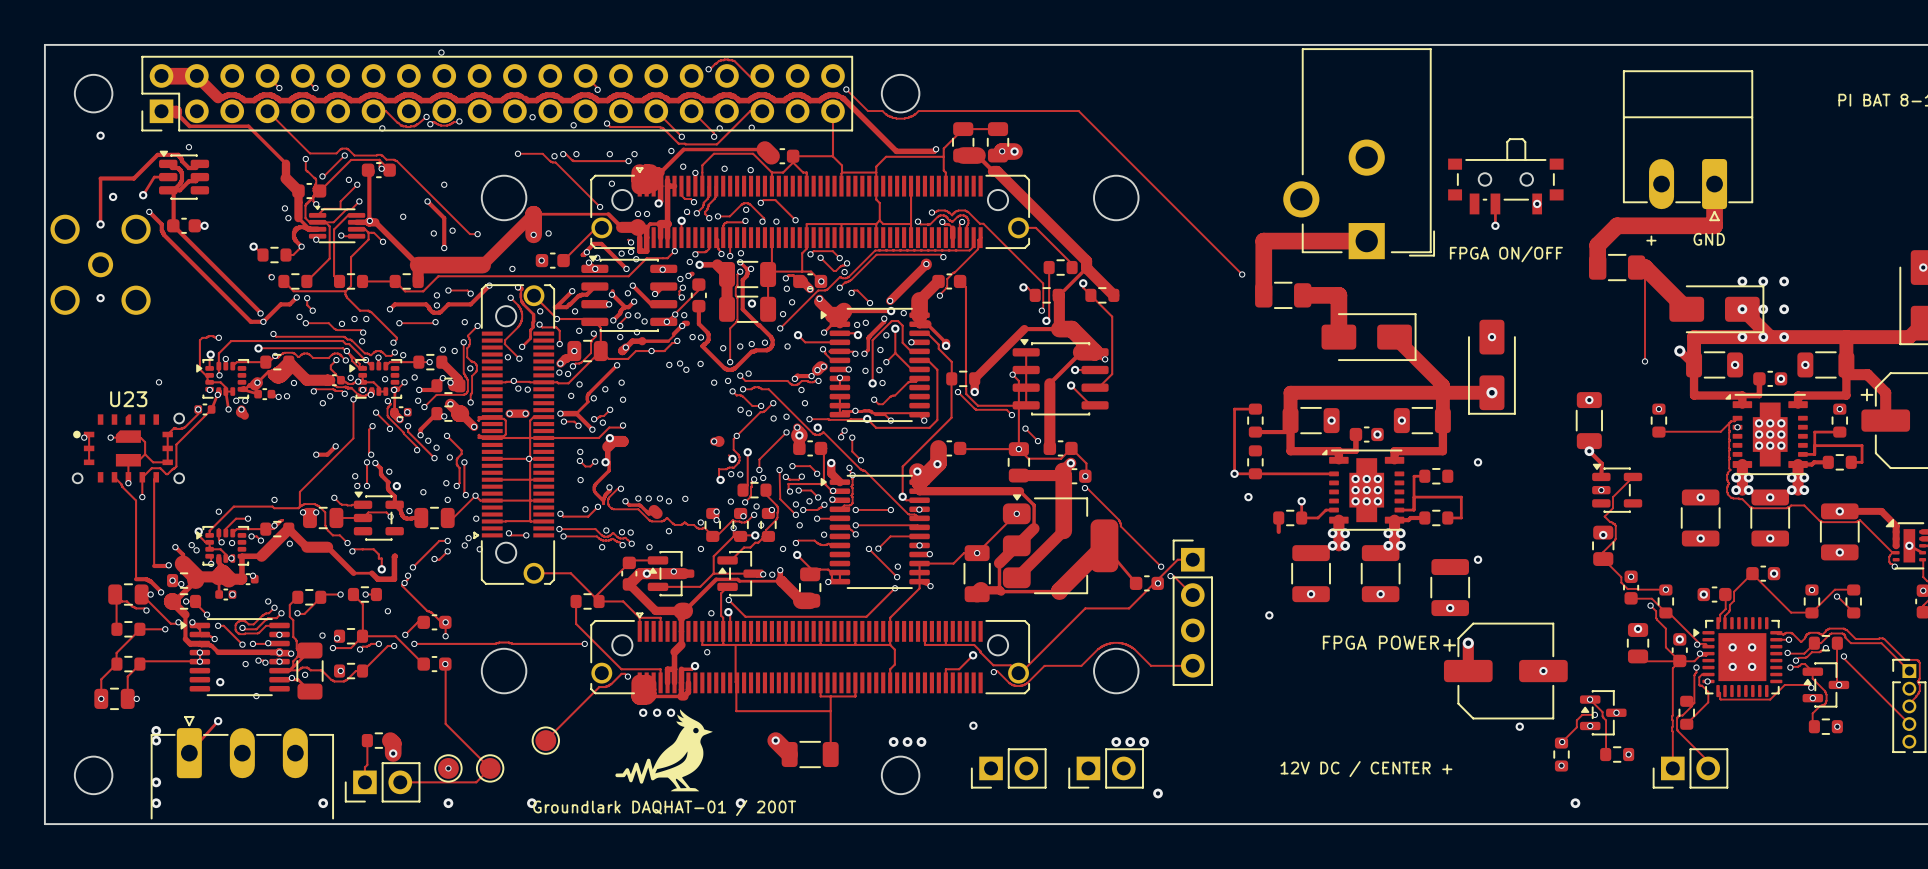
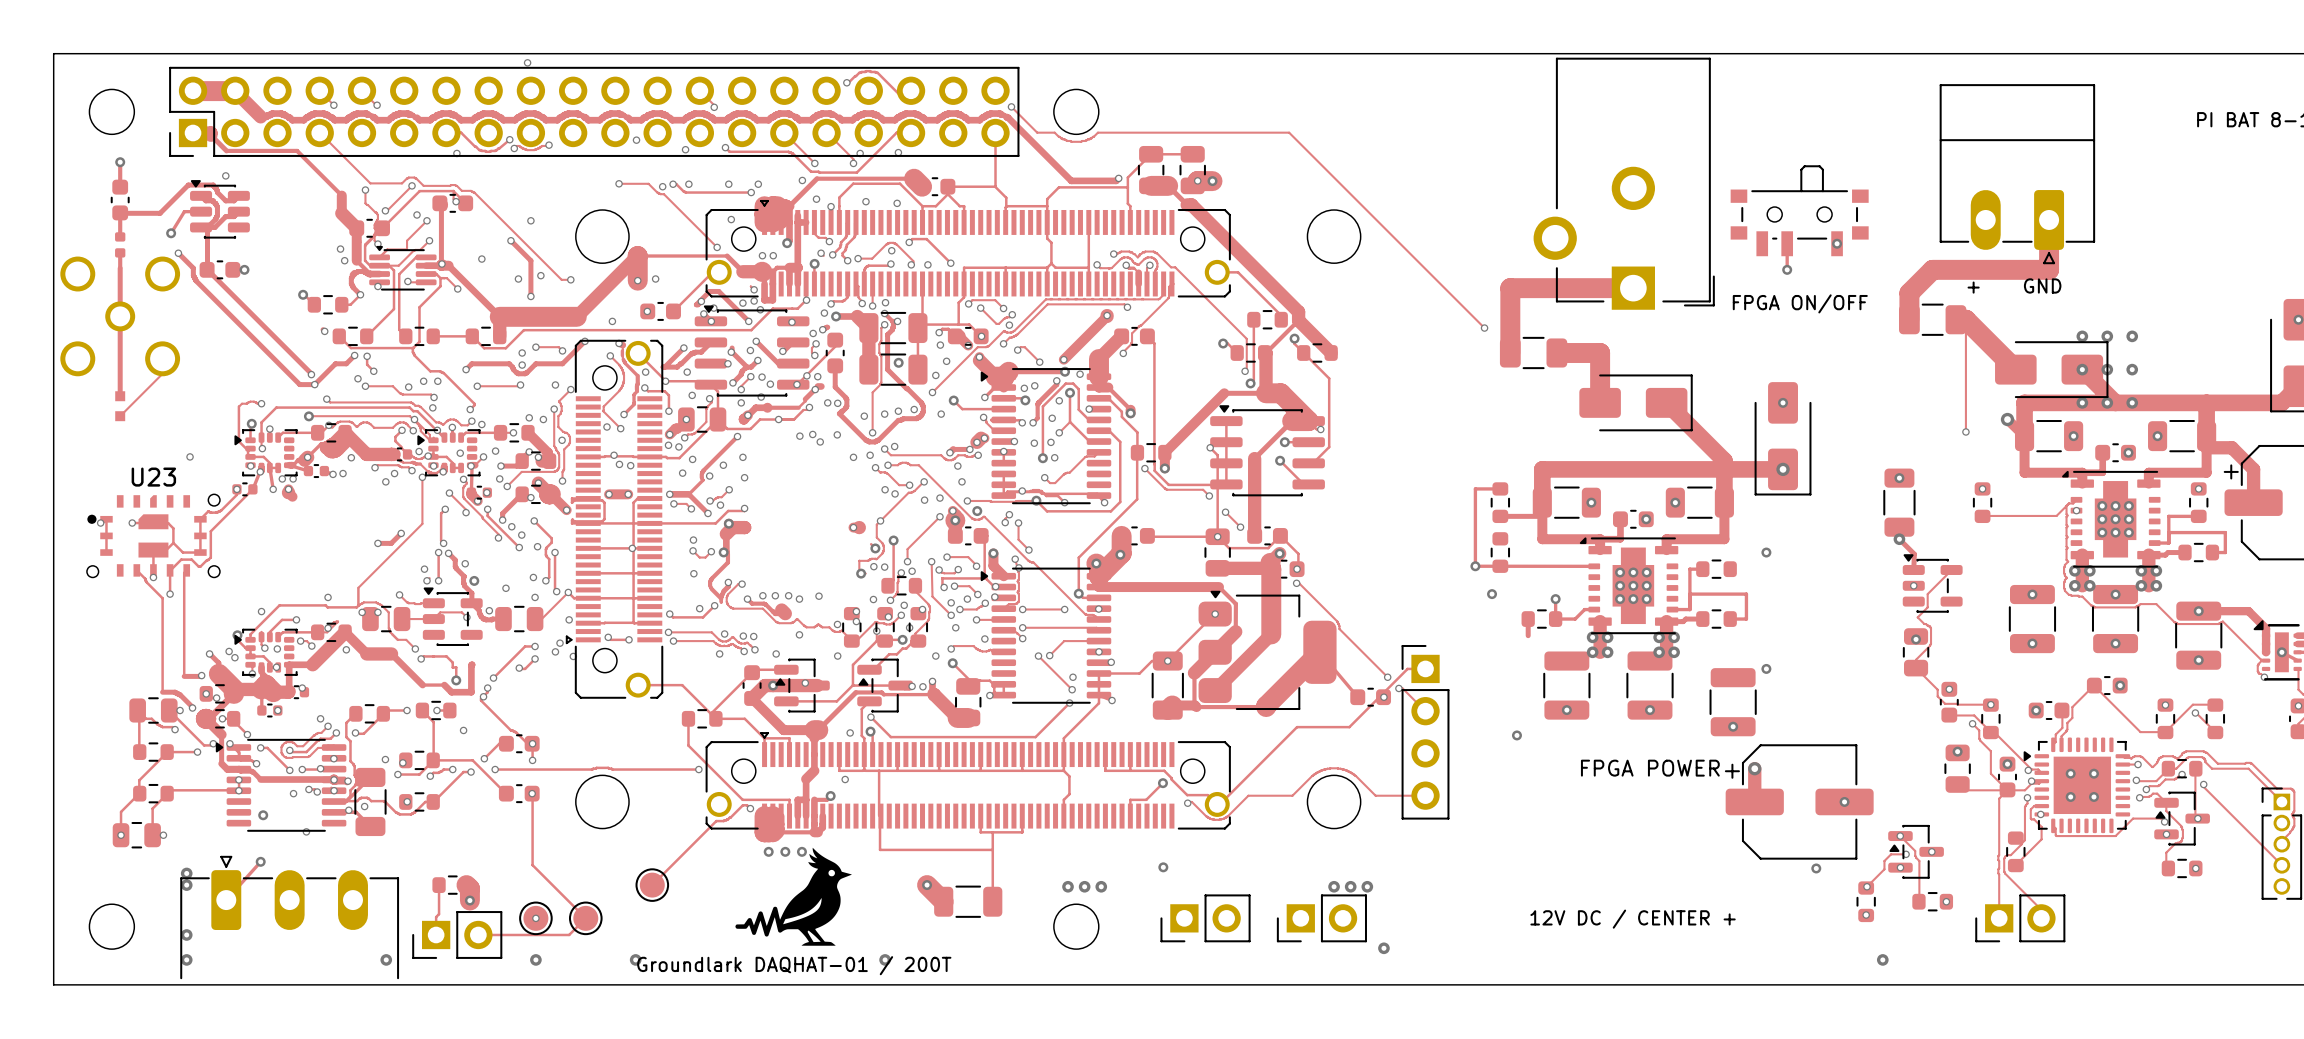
track: none -> (120, 162) (120, 187)
part: none -> (120, 200)
via: (113, 196) -> none
track: (100, 198) (100, 211) -> none
part: none -> (120, 244)
track: none -> (120, 268) (120, 396)
via: (100, 224) -> none
via: (100, 298) -> none
track: none -> (162, 373) (120, 416)
part: none -> (120, 406)

